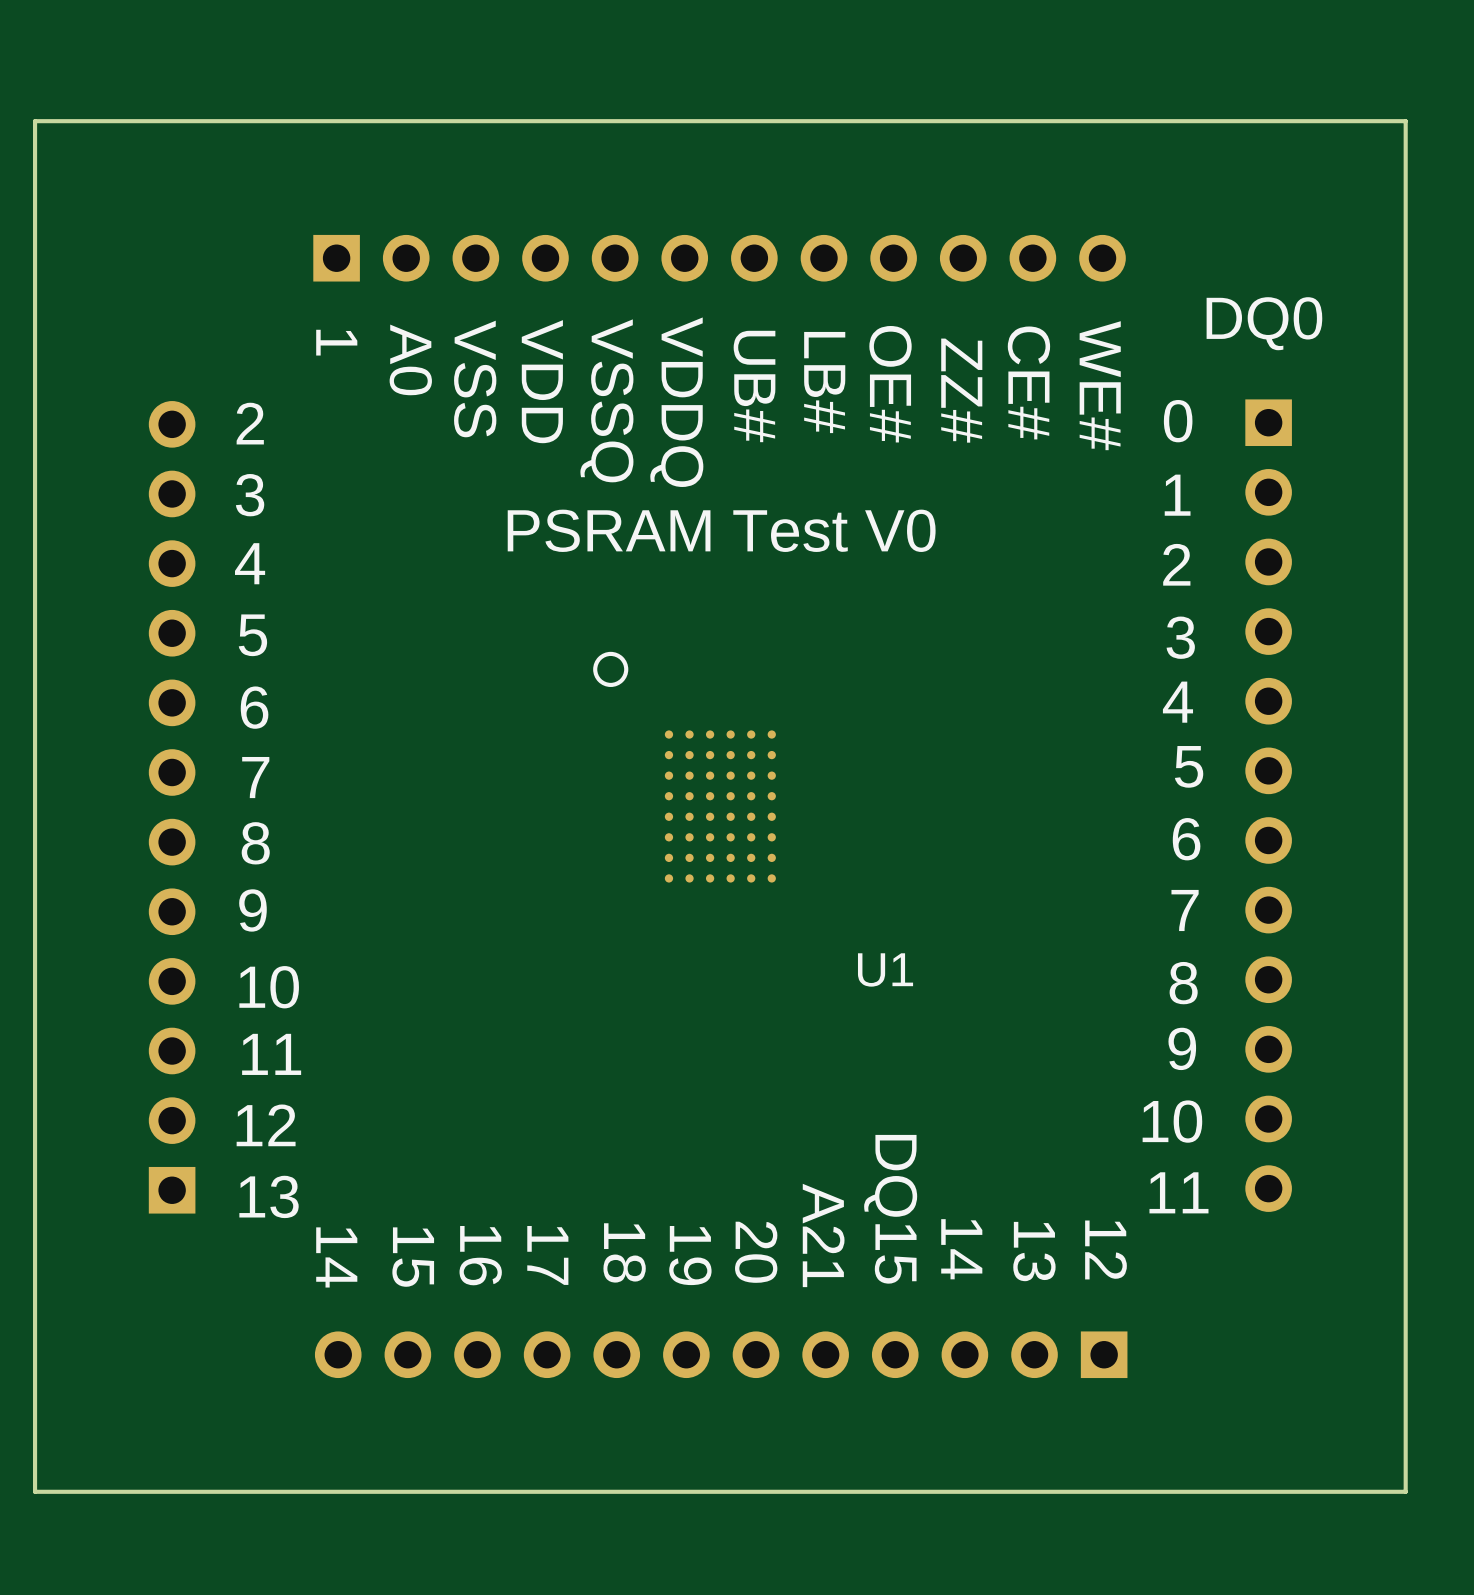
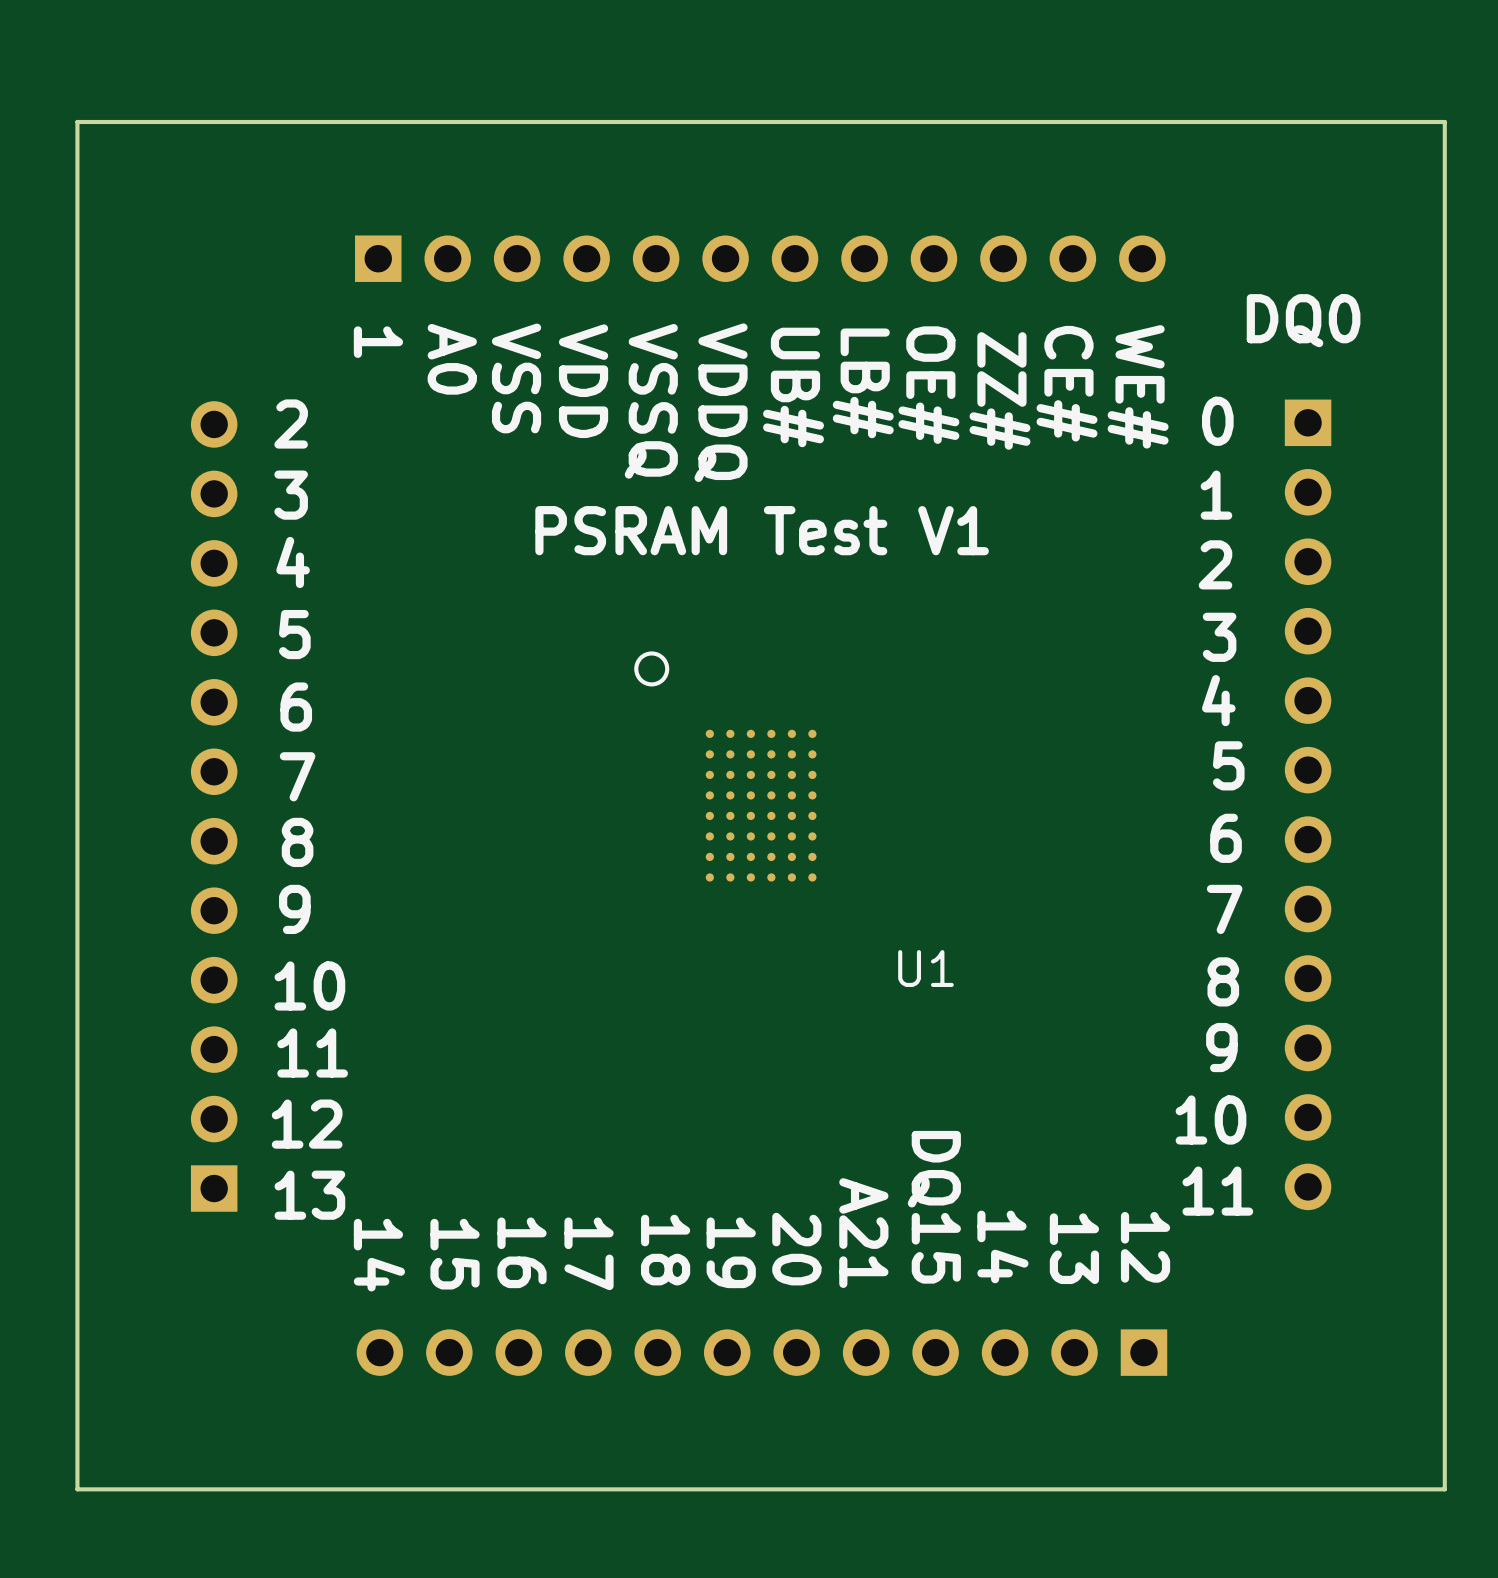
text: PSRAM Test V0 (721, 530) -> PSRAM Test V1 (762, 530)

